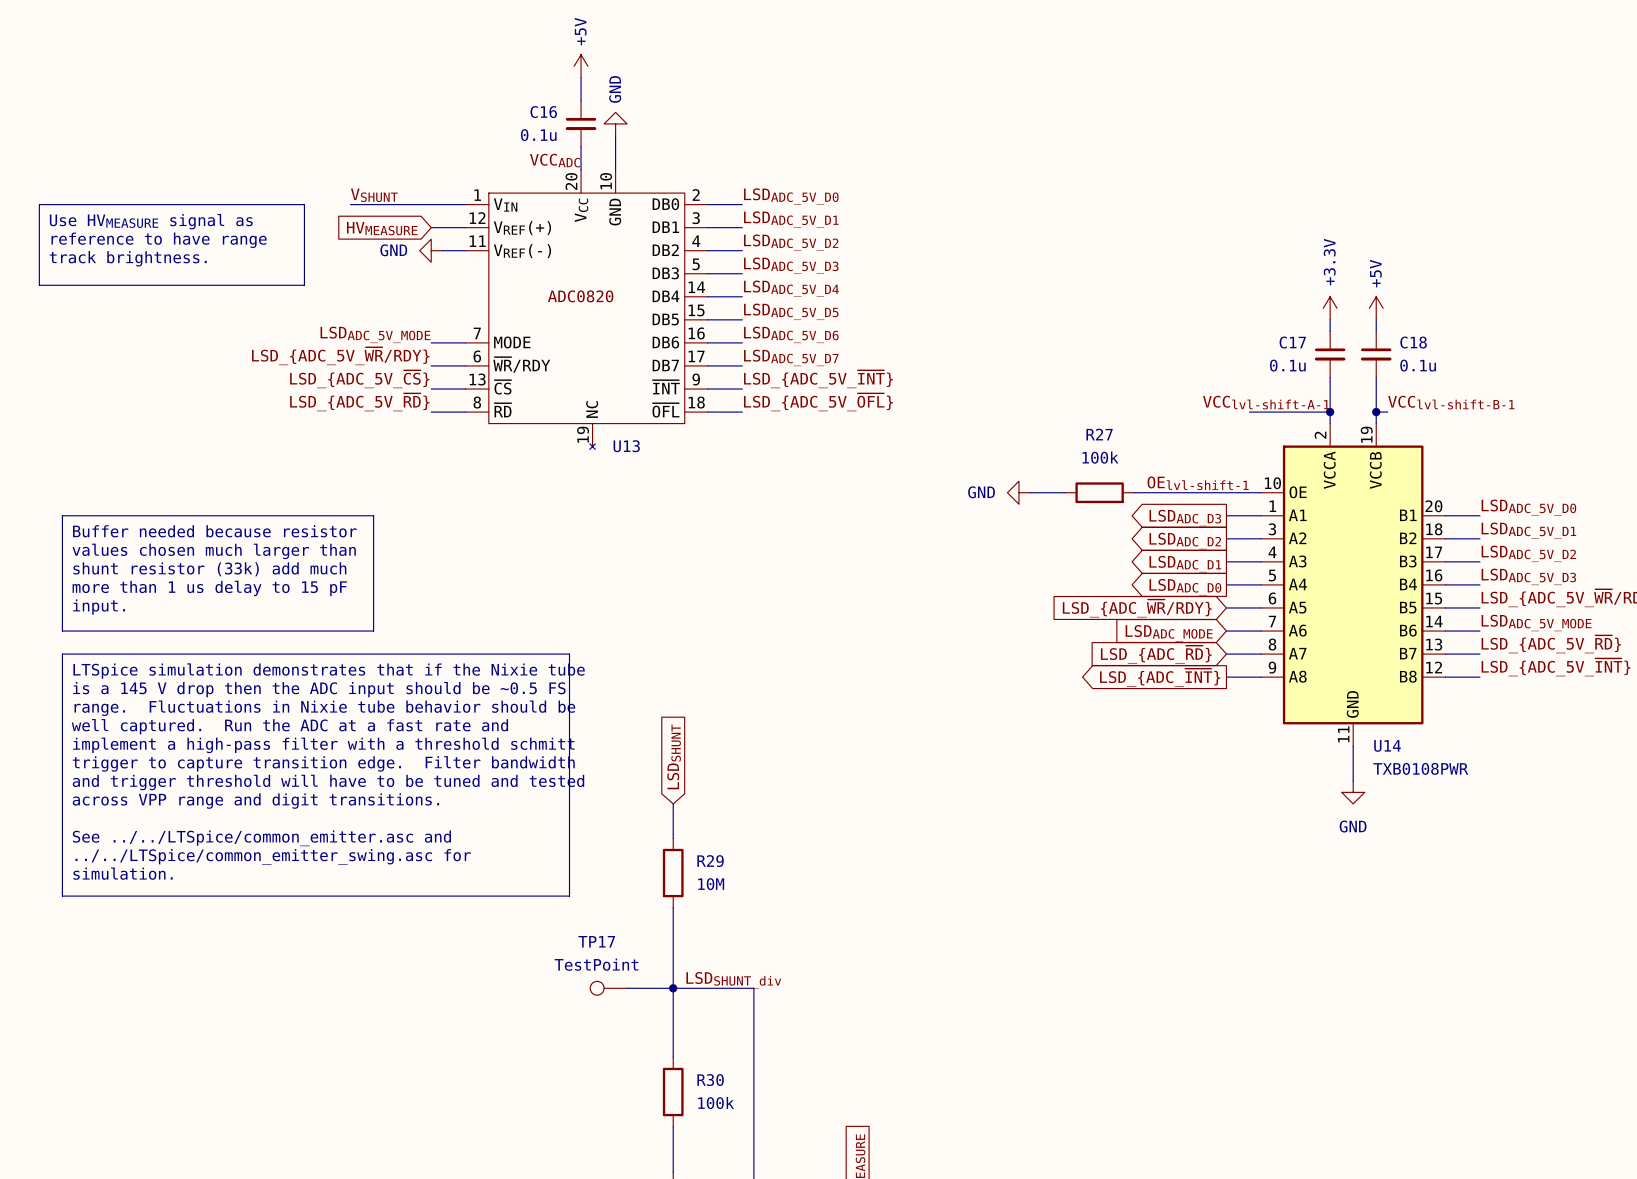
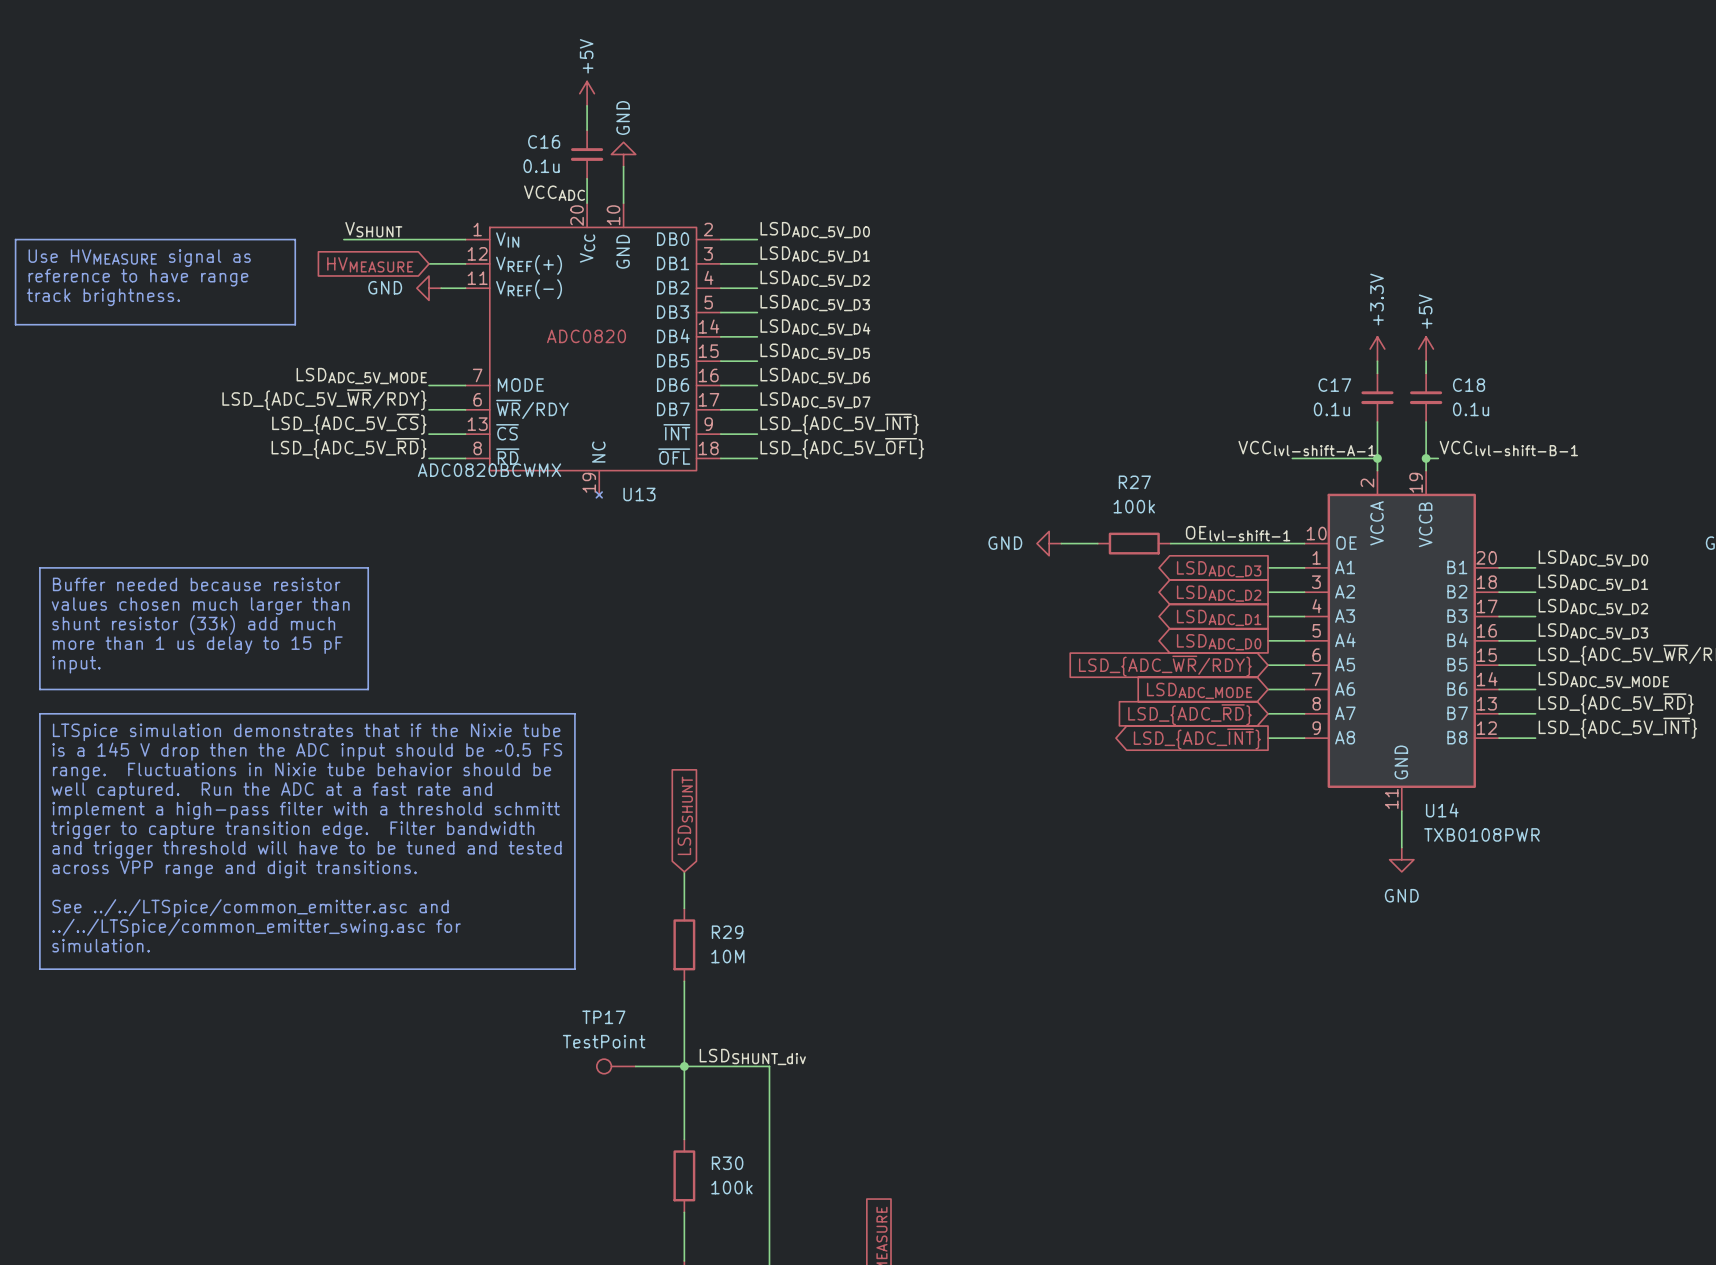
U13 value: none -> ADC0820BCWMX (489, 470)

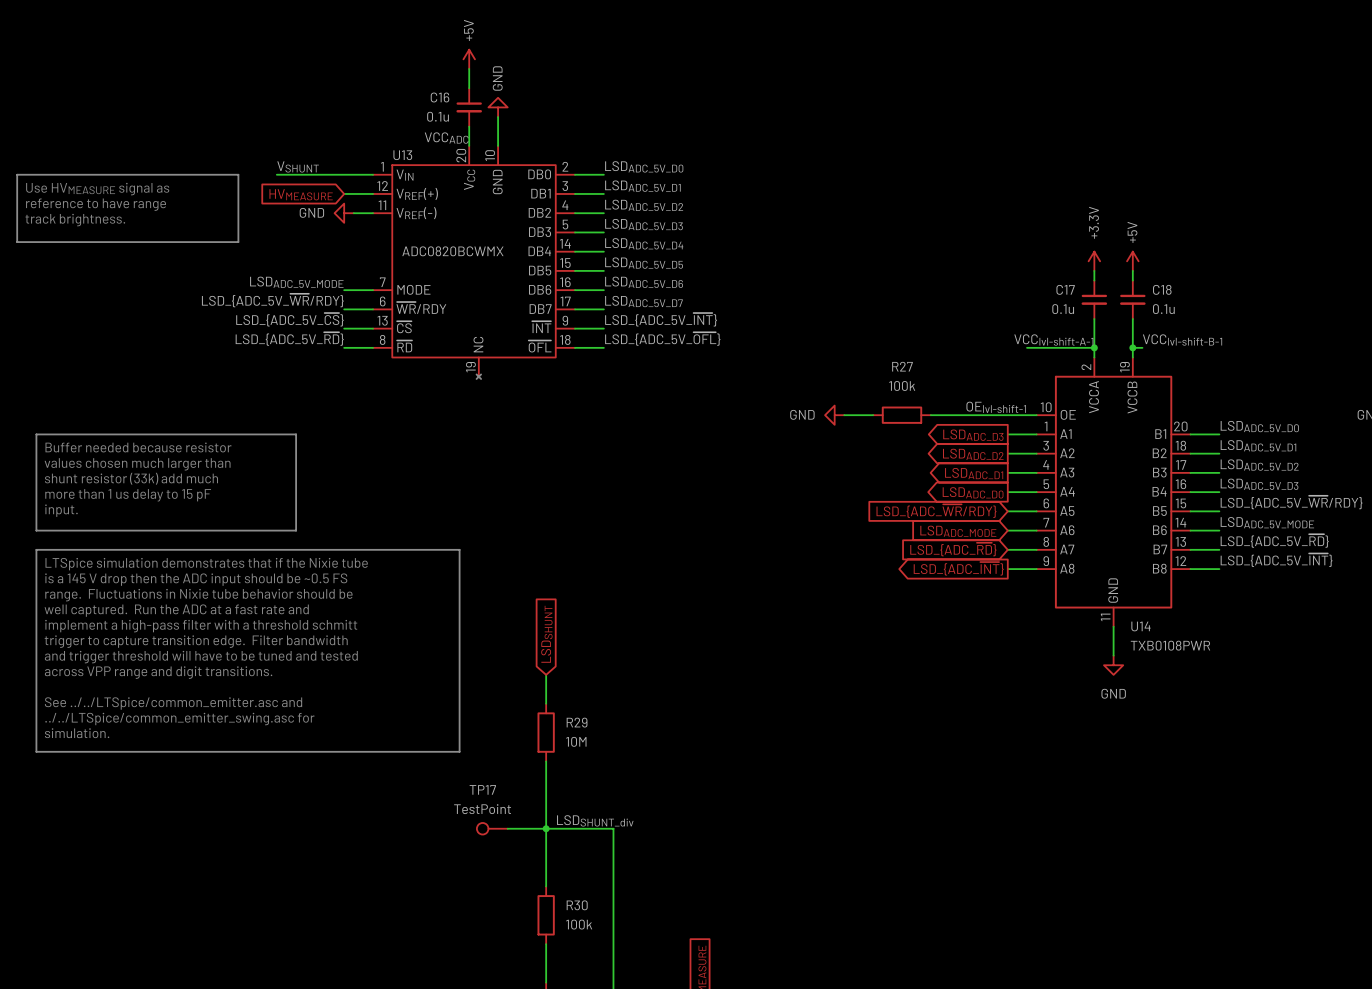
U13 text: ADC0820 (586, 336) -> none
U13 value position: ADC0820BCWMX (489, 470) -> ADC0820BCWMX (452, 251)
U13 name position: U13 (639, 494) -> U13 (402, 155)

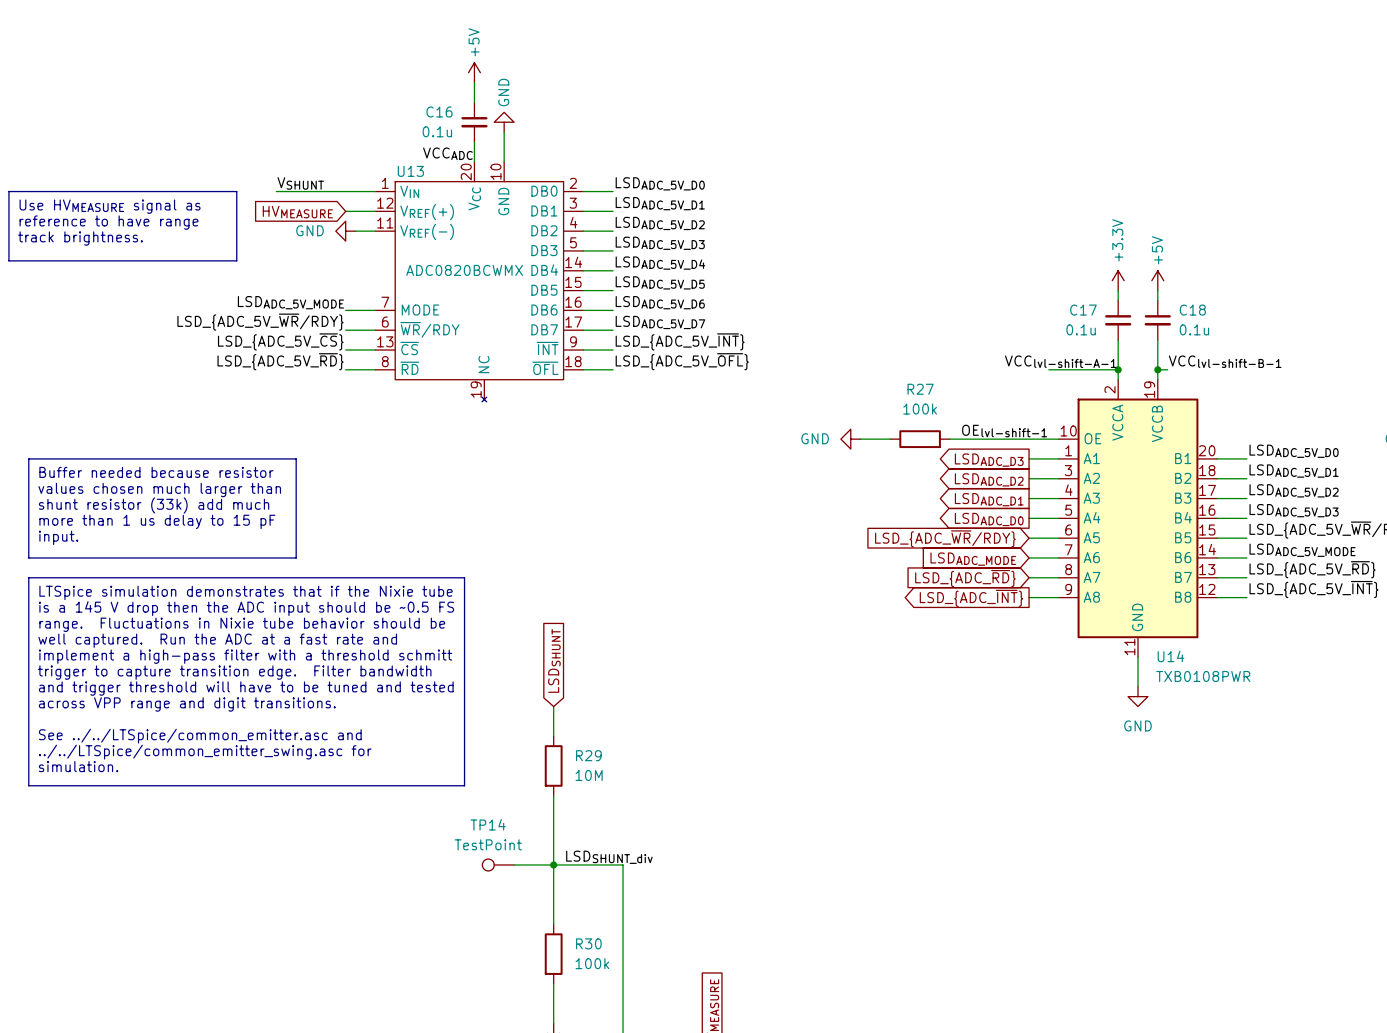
TP17 name: TP17 (482, 789) -> TP14 (488, 824)

